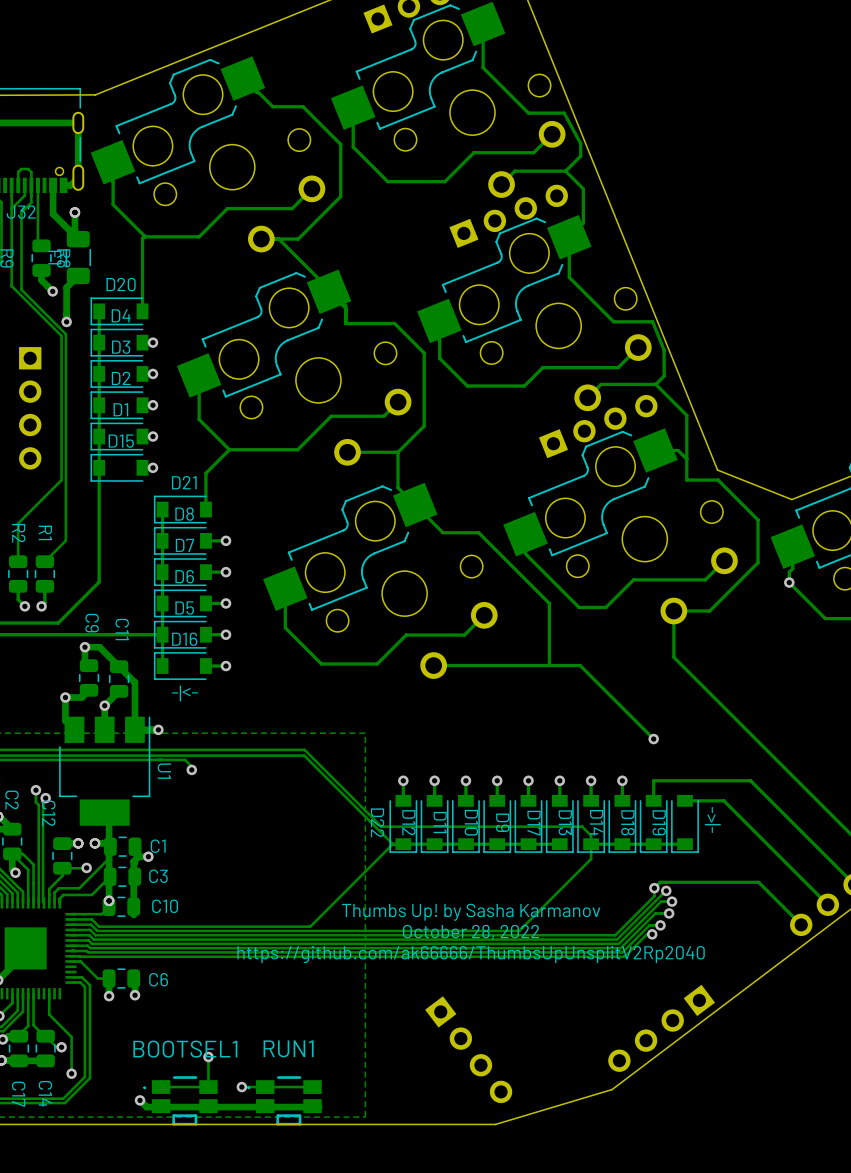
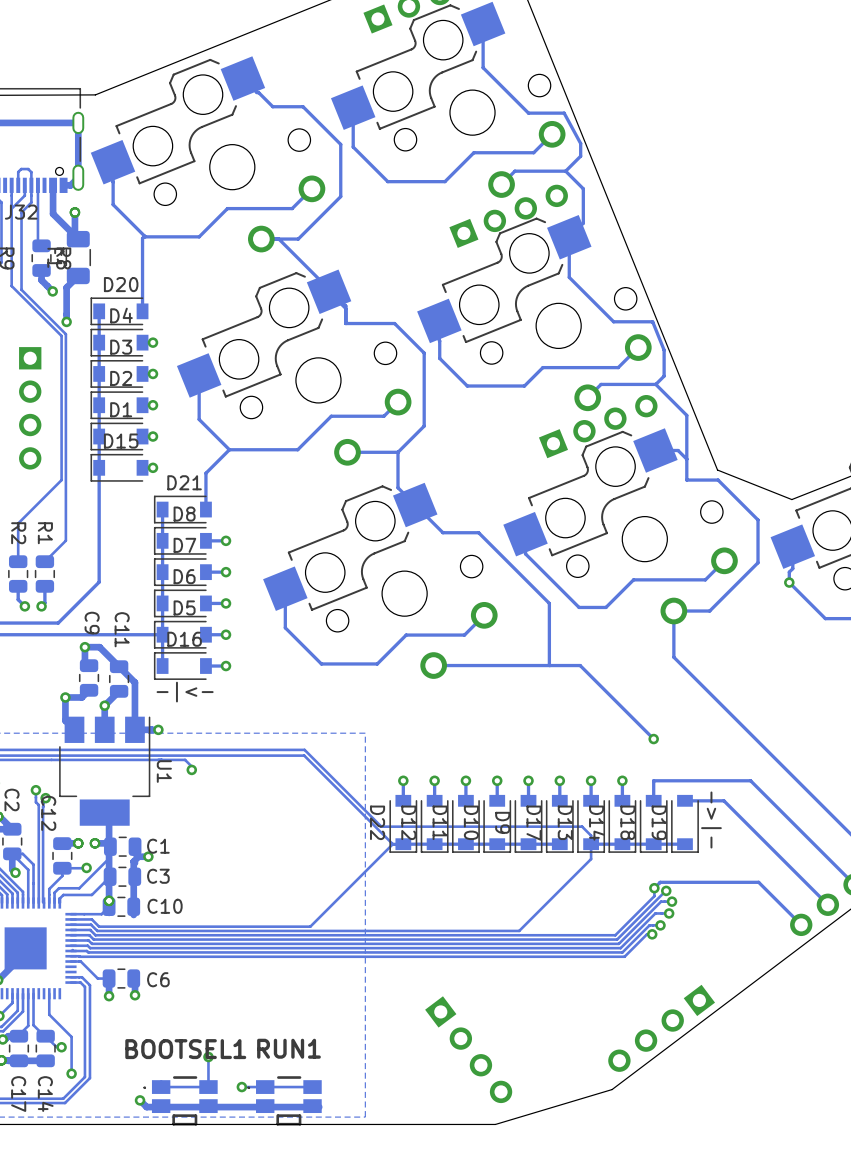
text: Thumbs Up! by Sasha Karmanov (471, 912) -> none
text: October 28, 2022 (471, 932) -> none
text: https://github.com/ak66666/ThumbsUpUnsplitV2Rp2040 (471, 954) -> none

